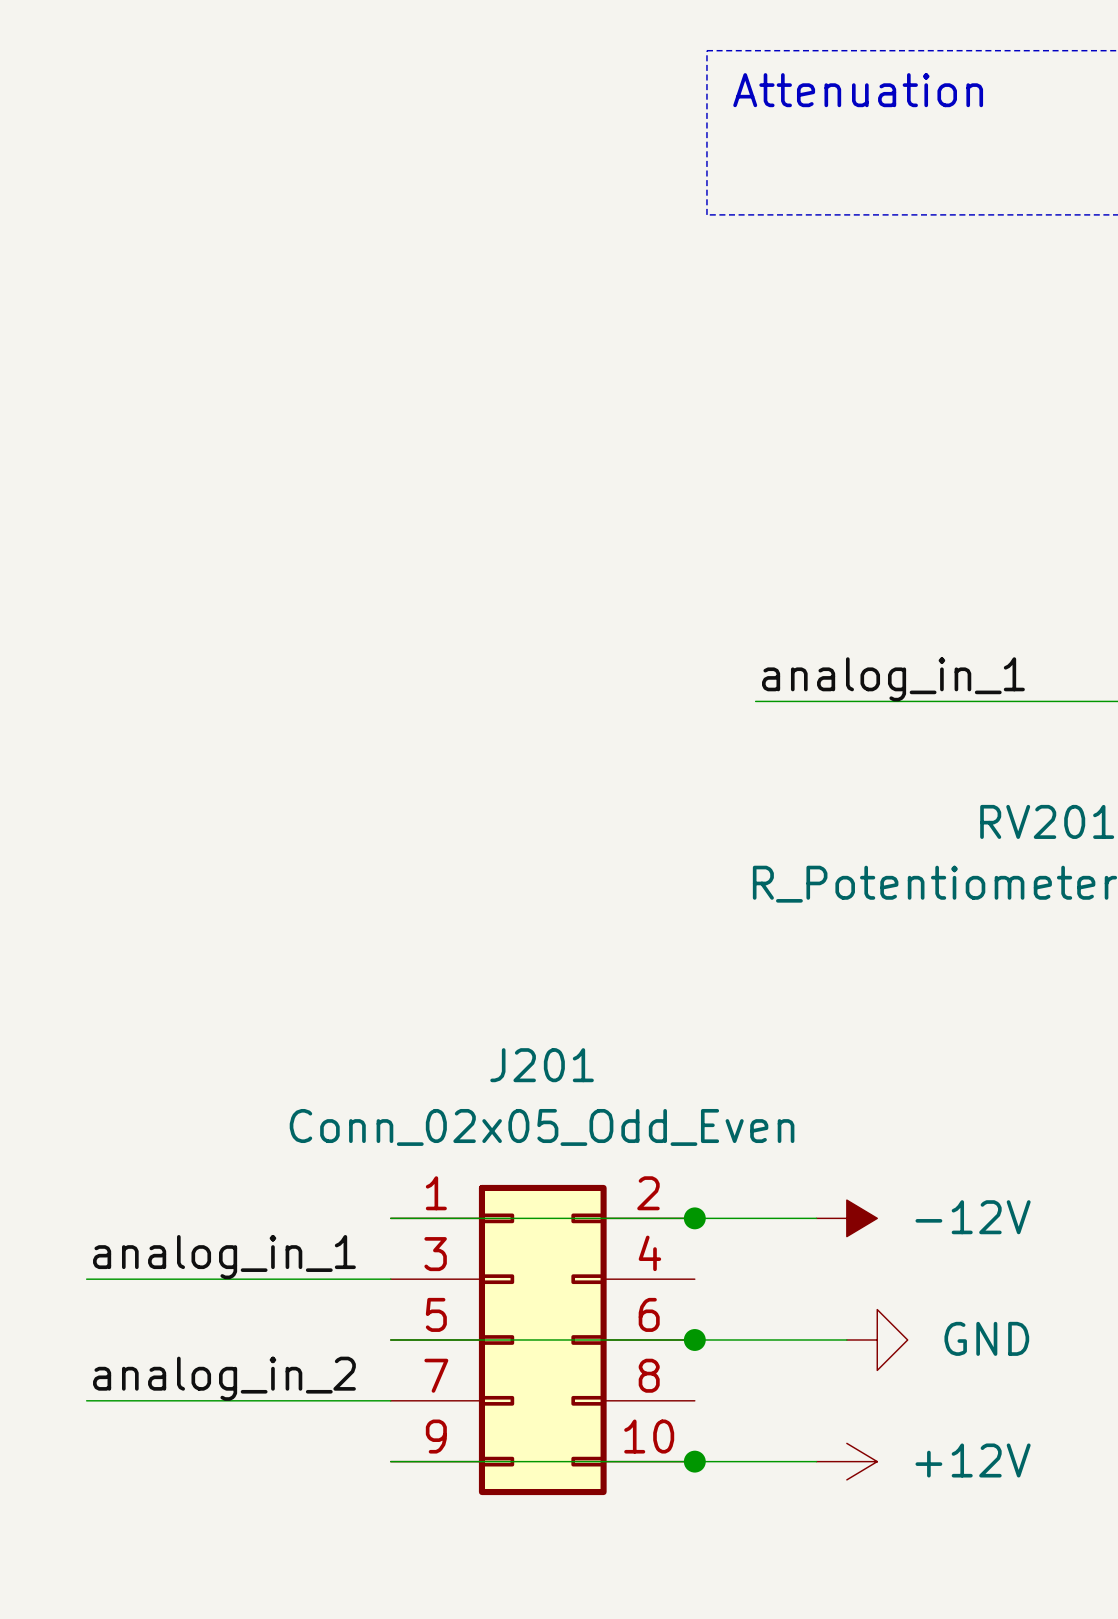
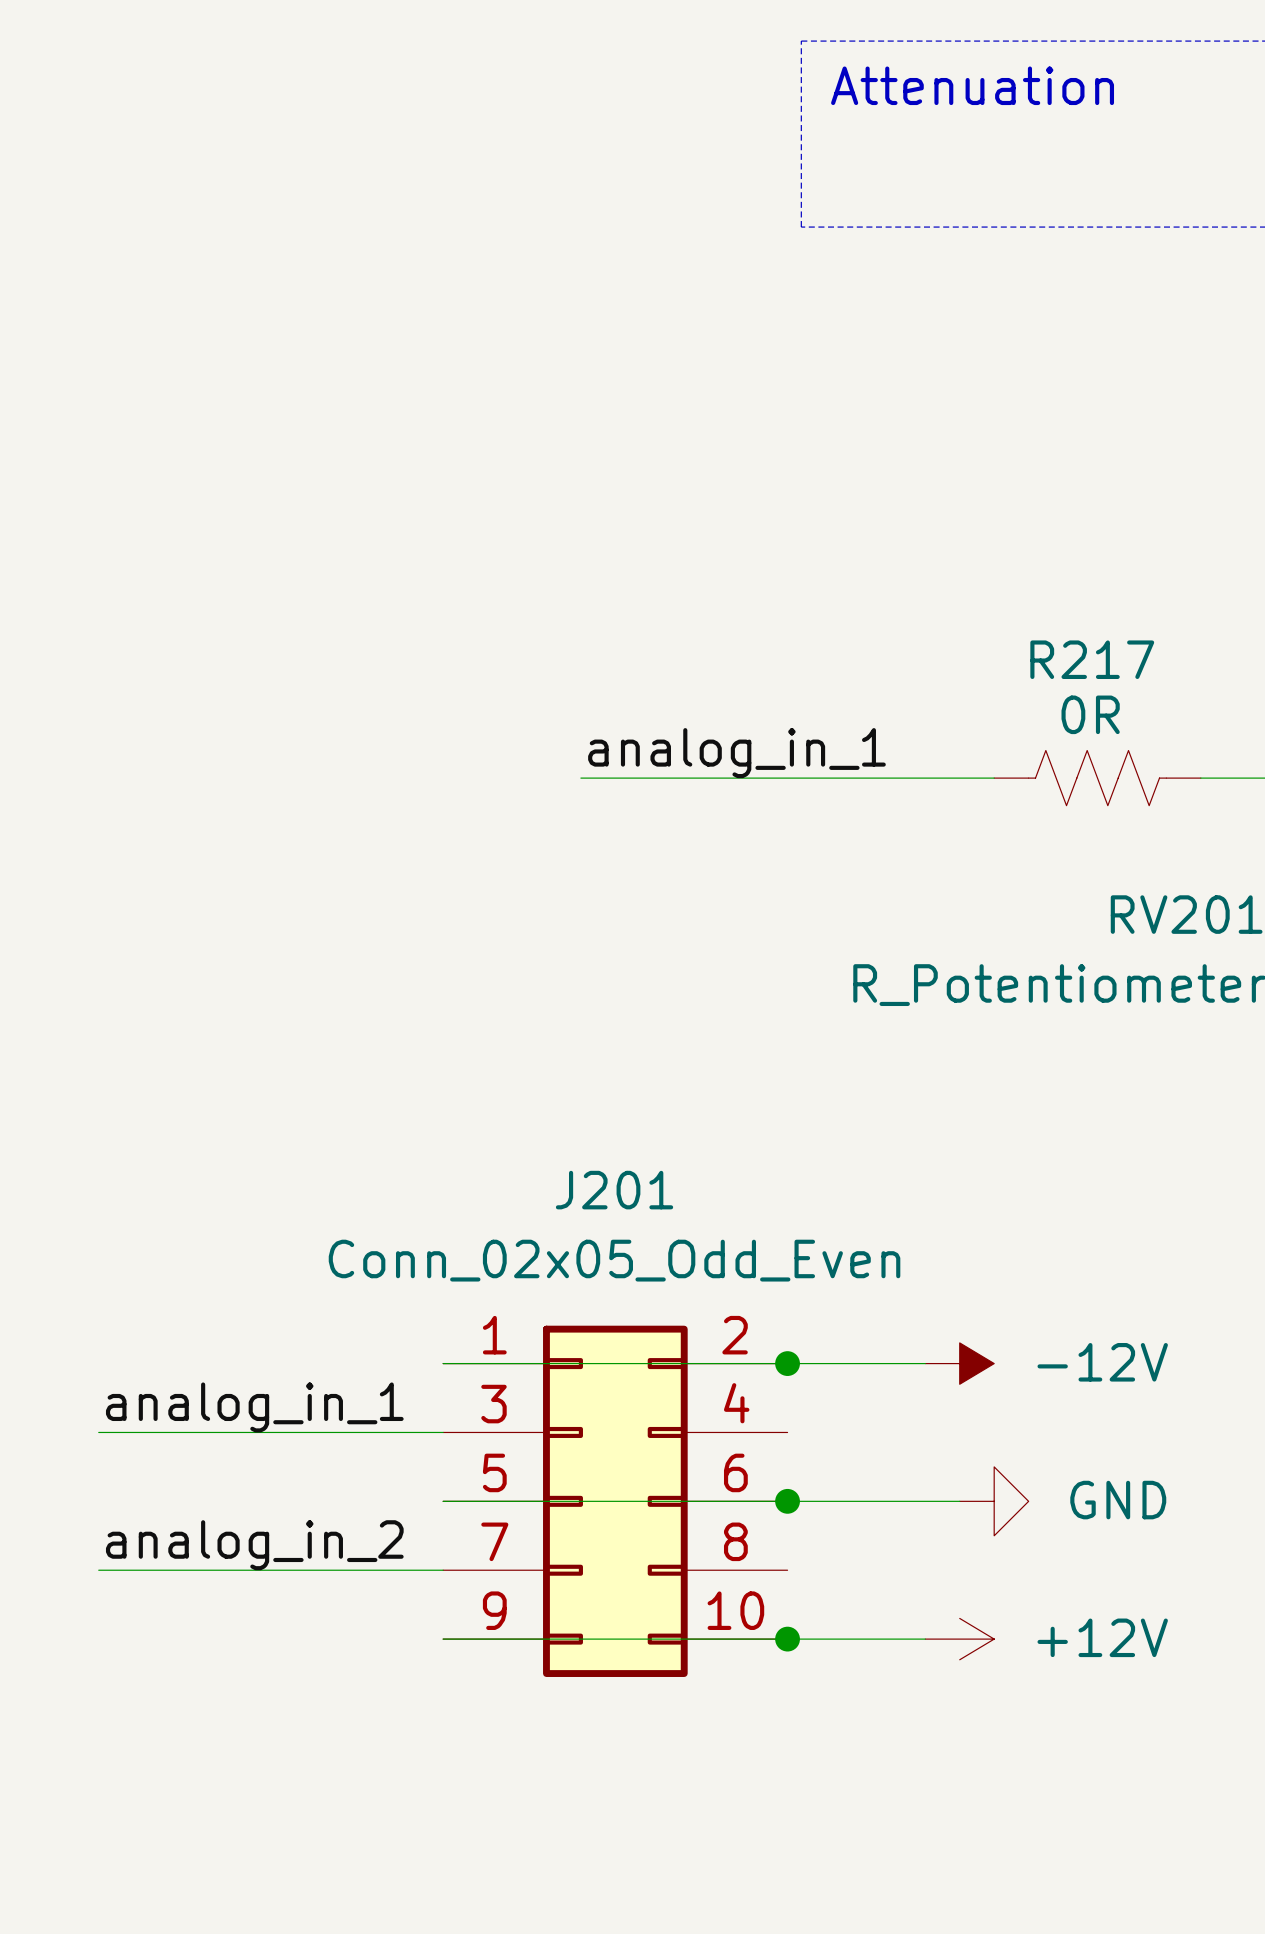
label position: analog_in_1 (893, 679) -> analog_in_1 (736, 753)
wire: none -> (580, 778) (856, 778)
wire: (877, 701) (1059, 701) -> none
R217: none -> 0R (1097, 778)

